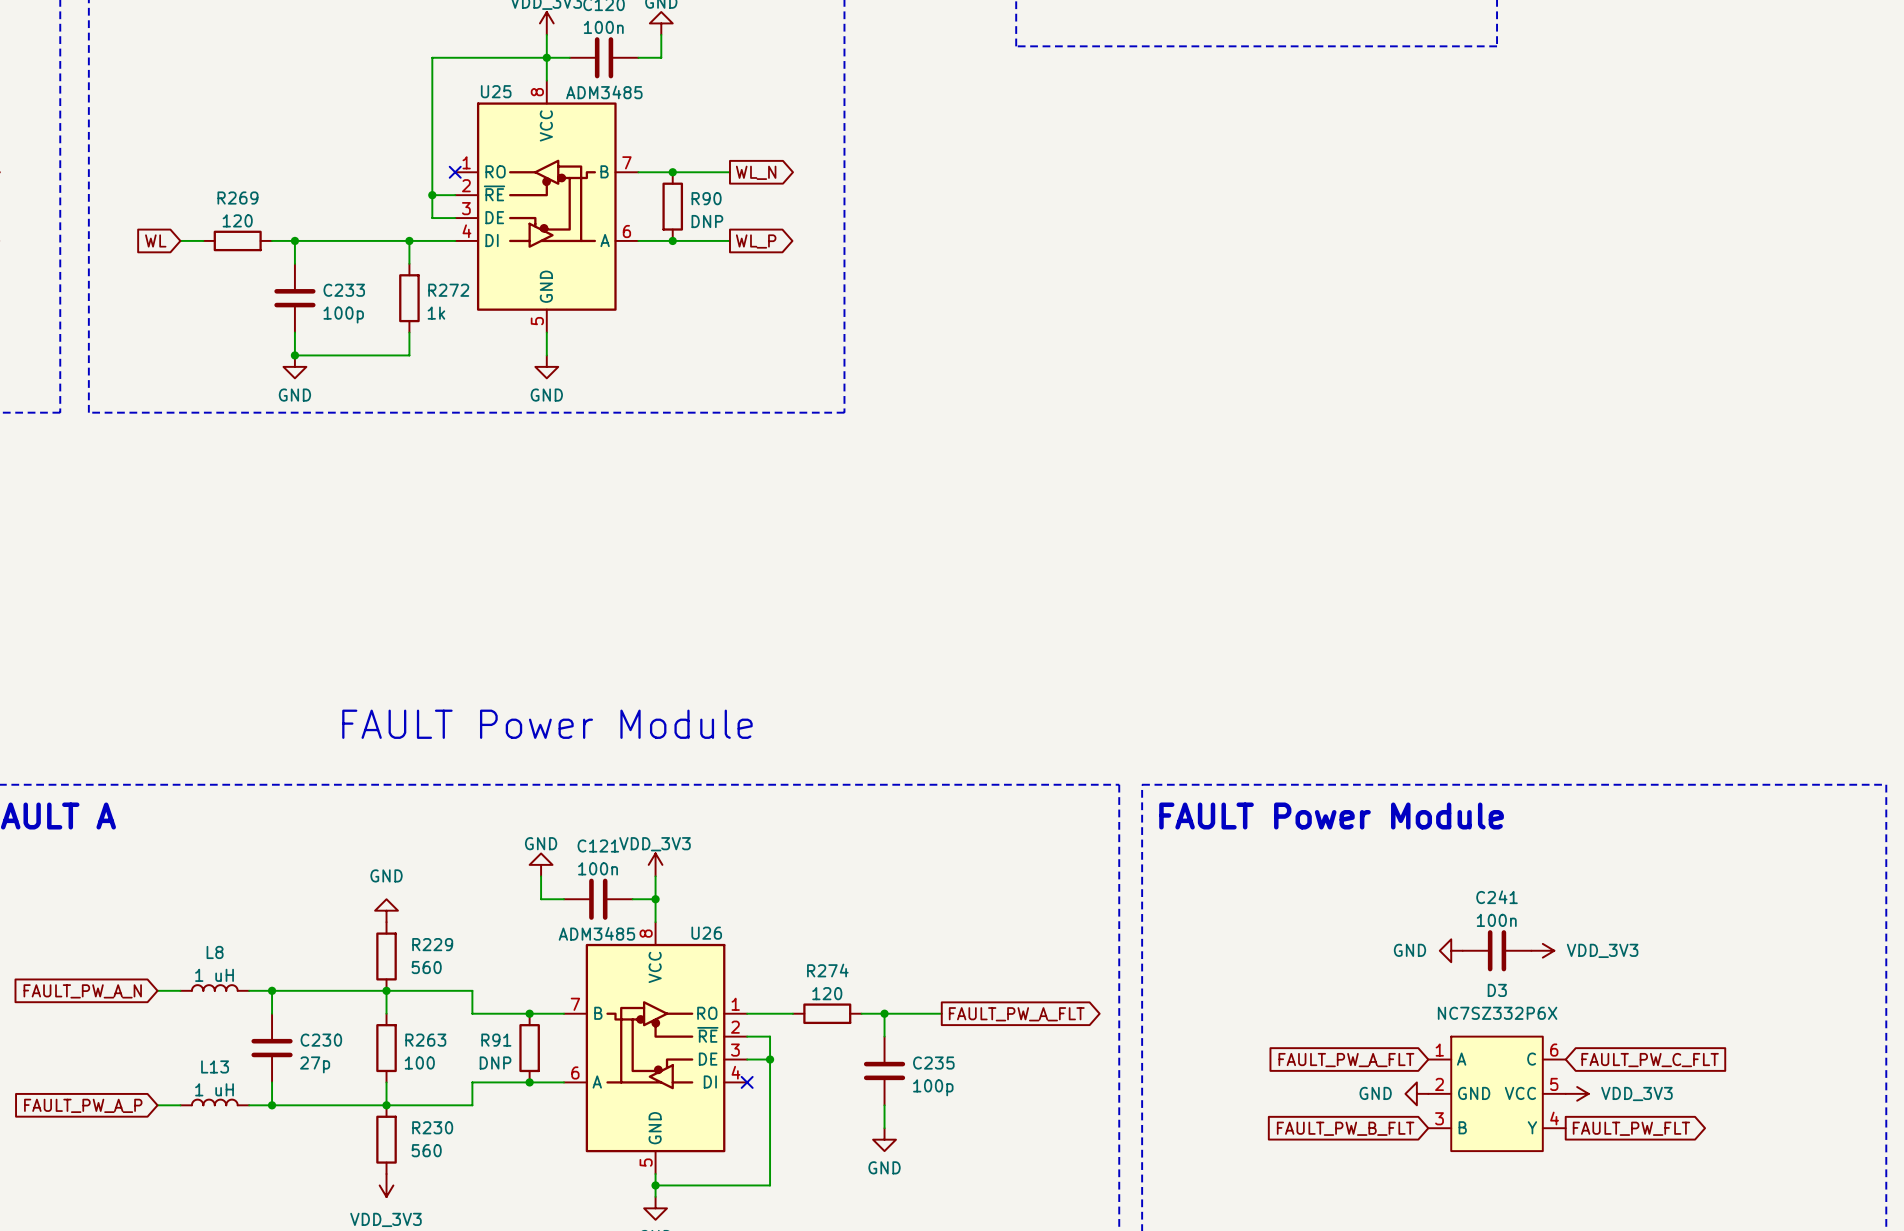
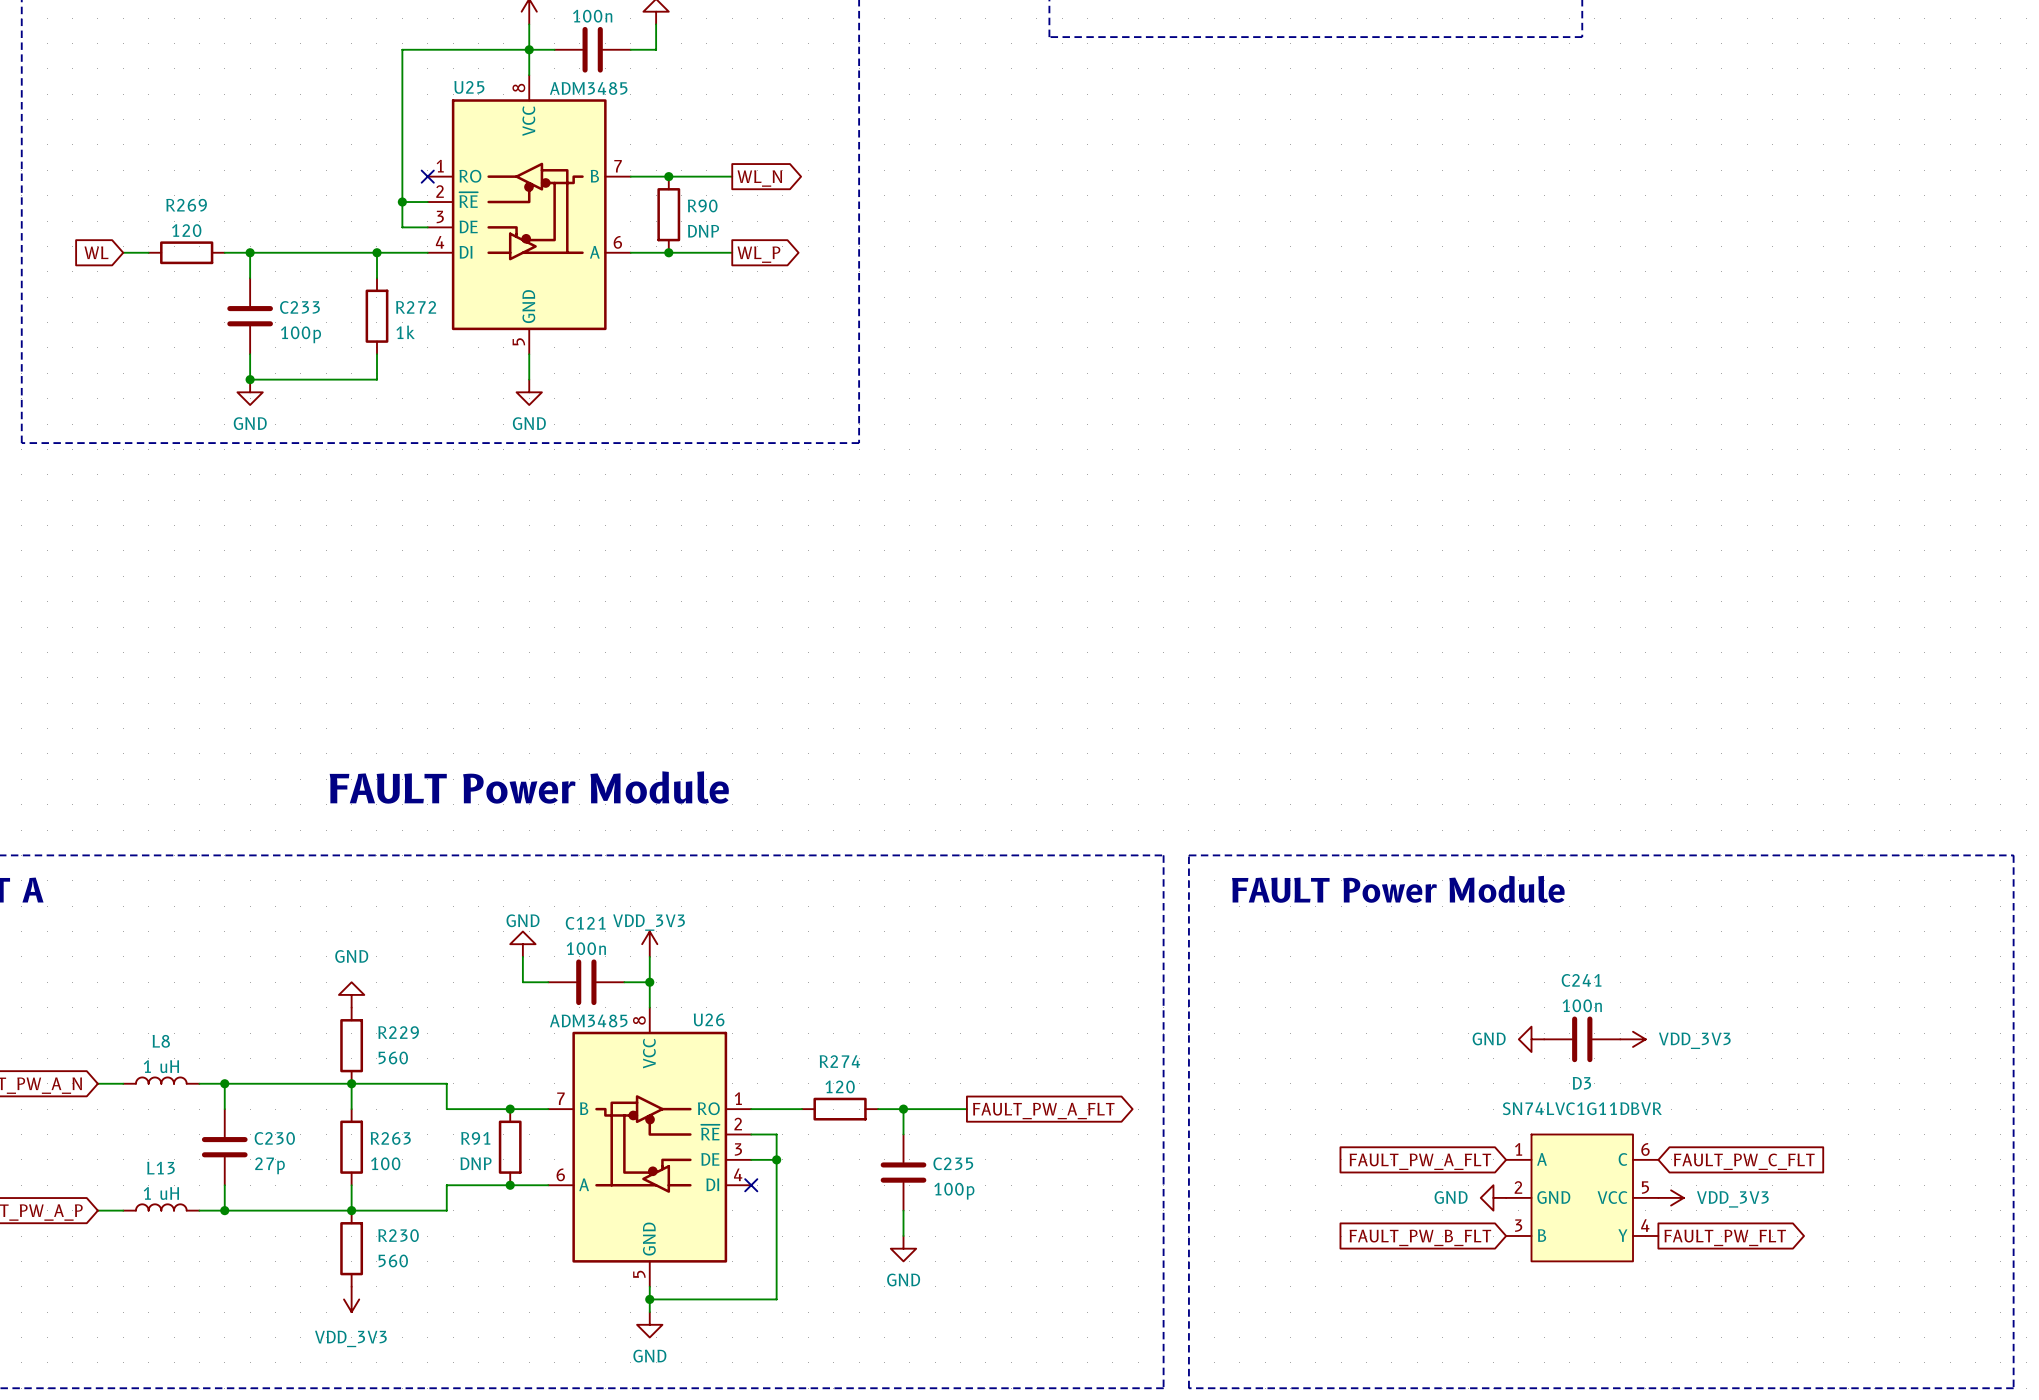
D3 value: NC7SZ332P6X (1497, 1013) -> SN74LVC1G11DBVR (1582, 1108)

